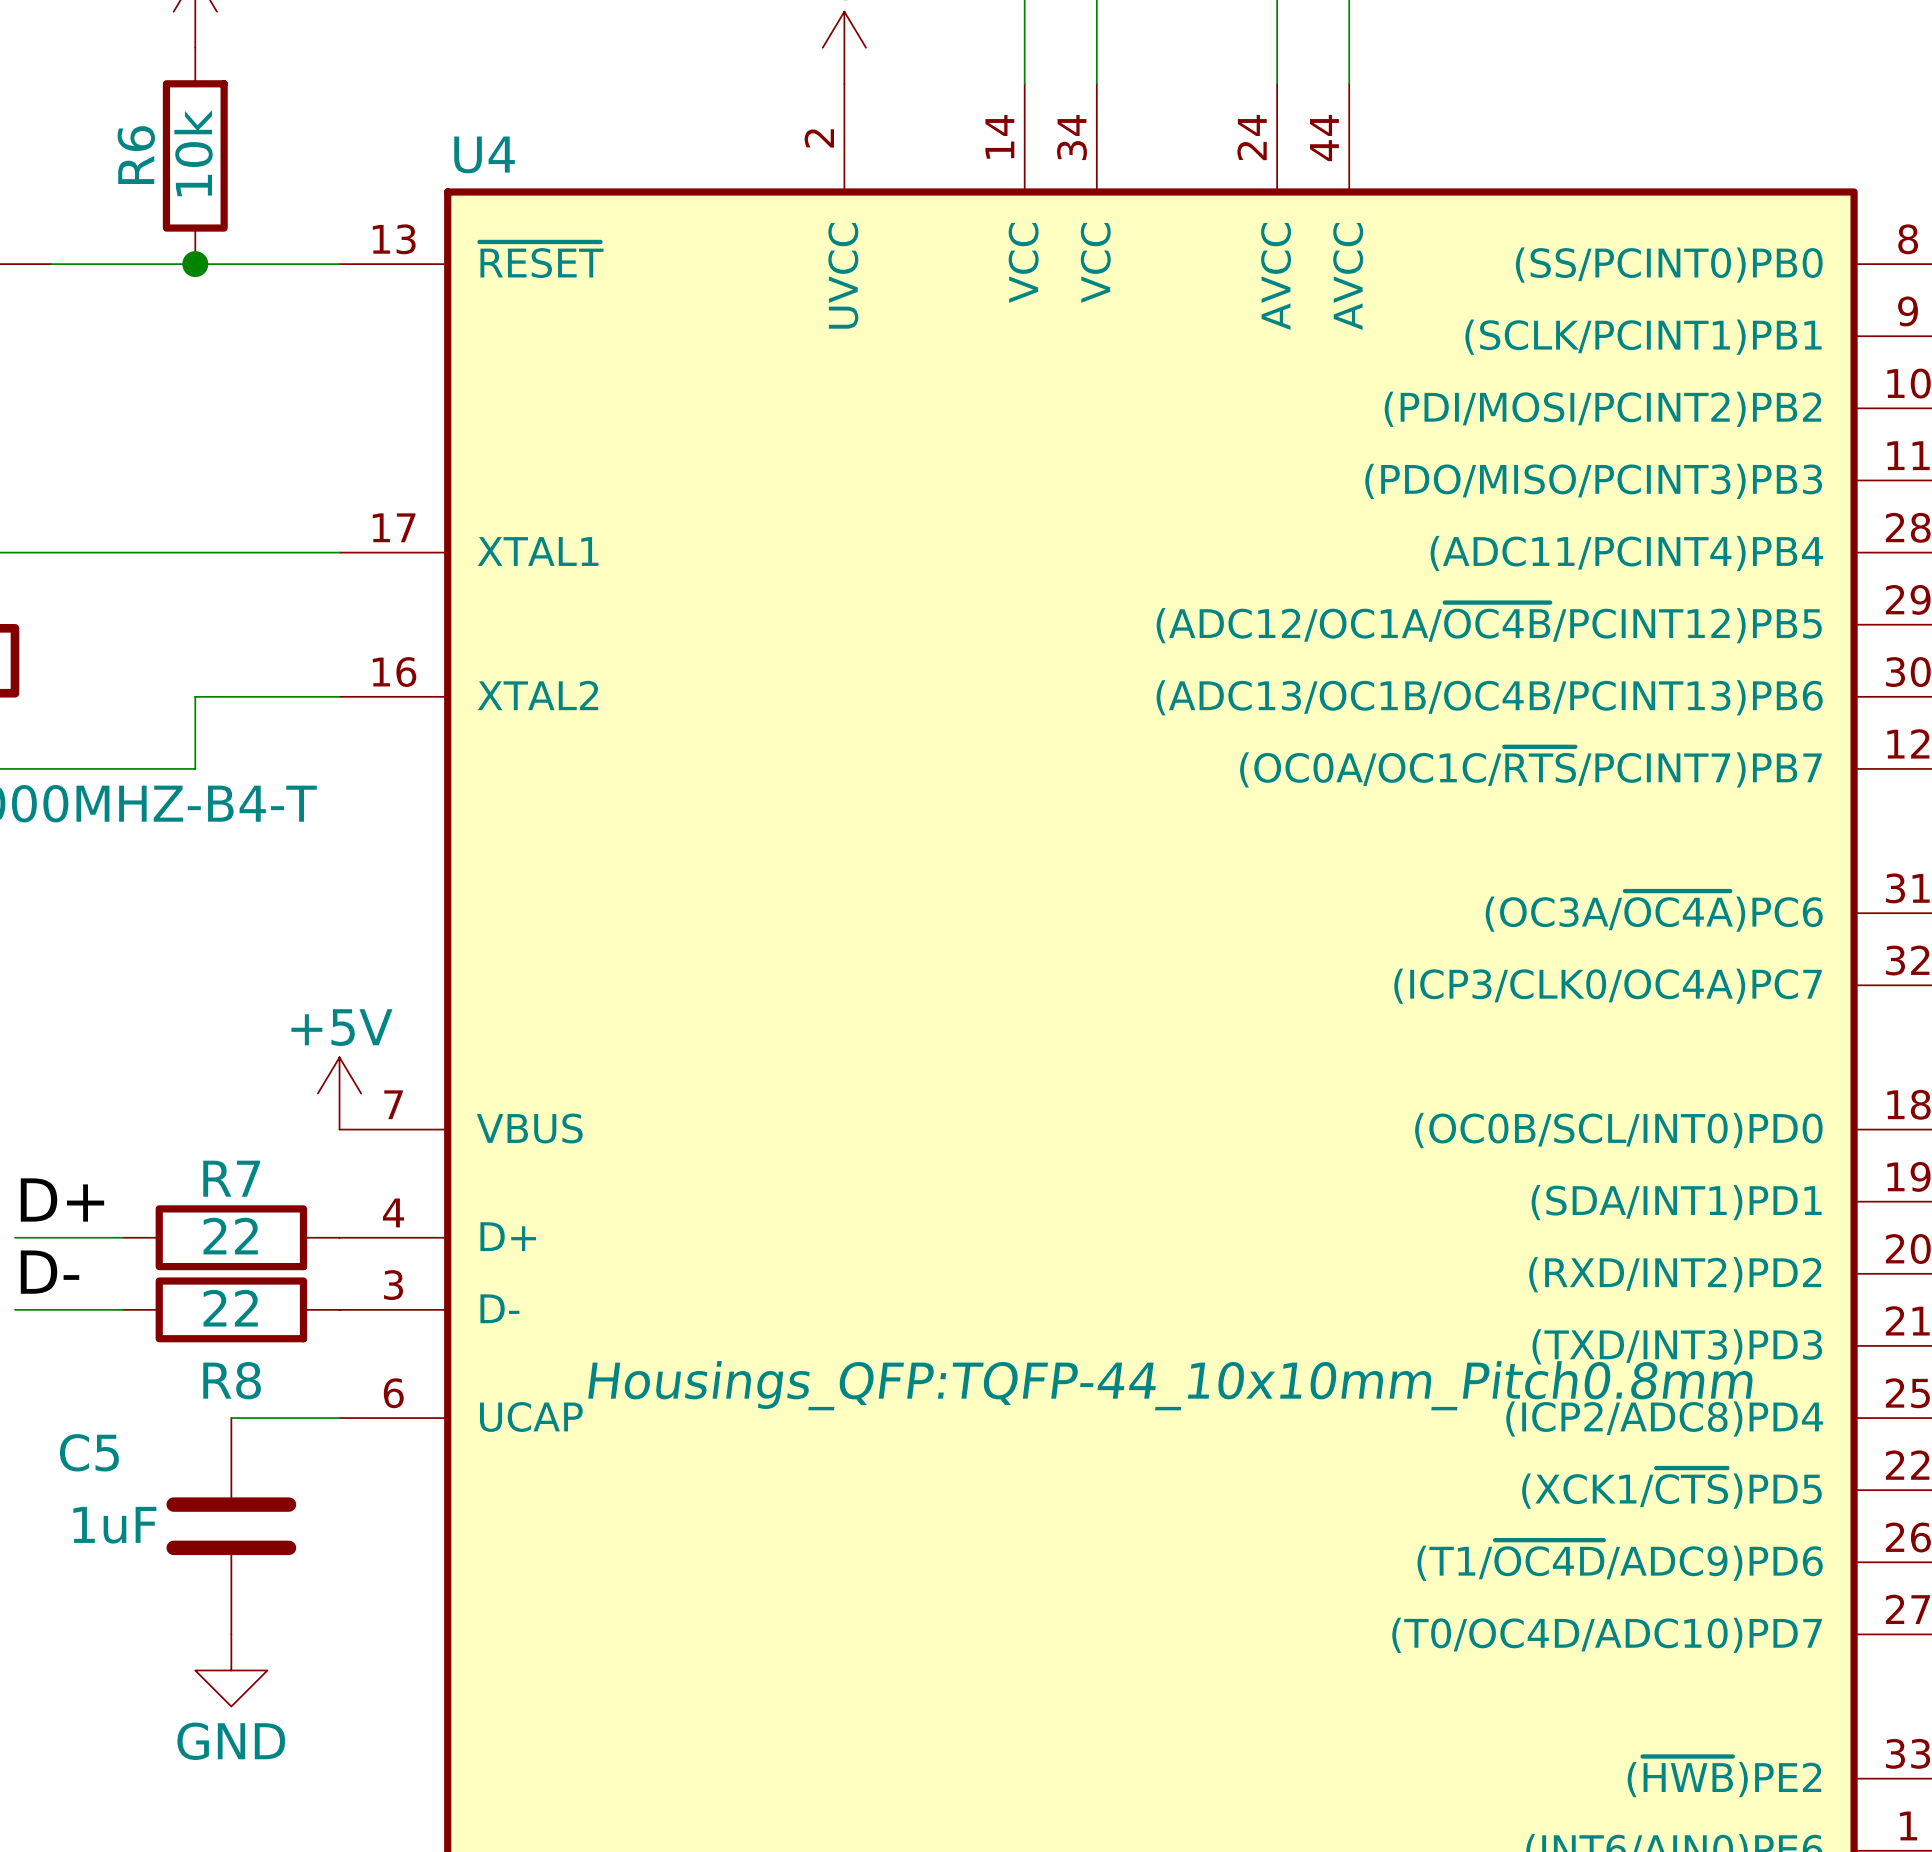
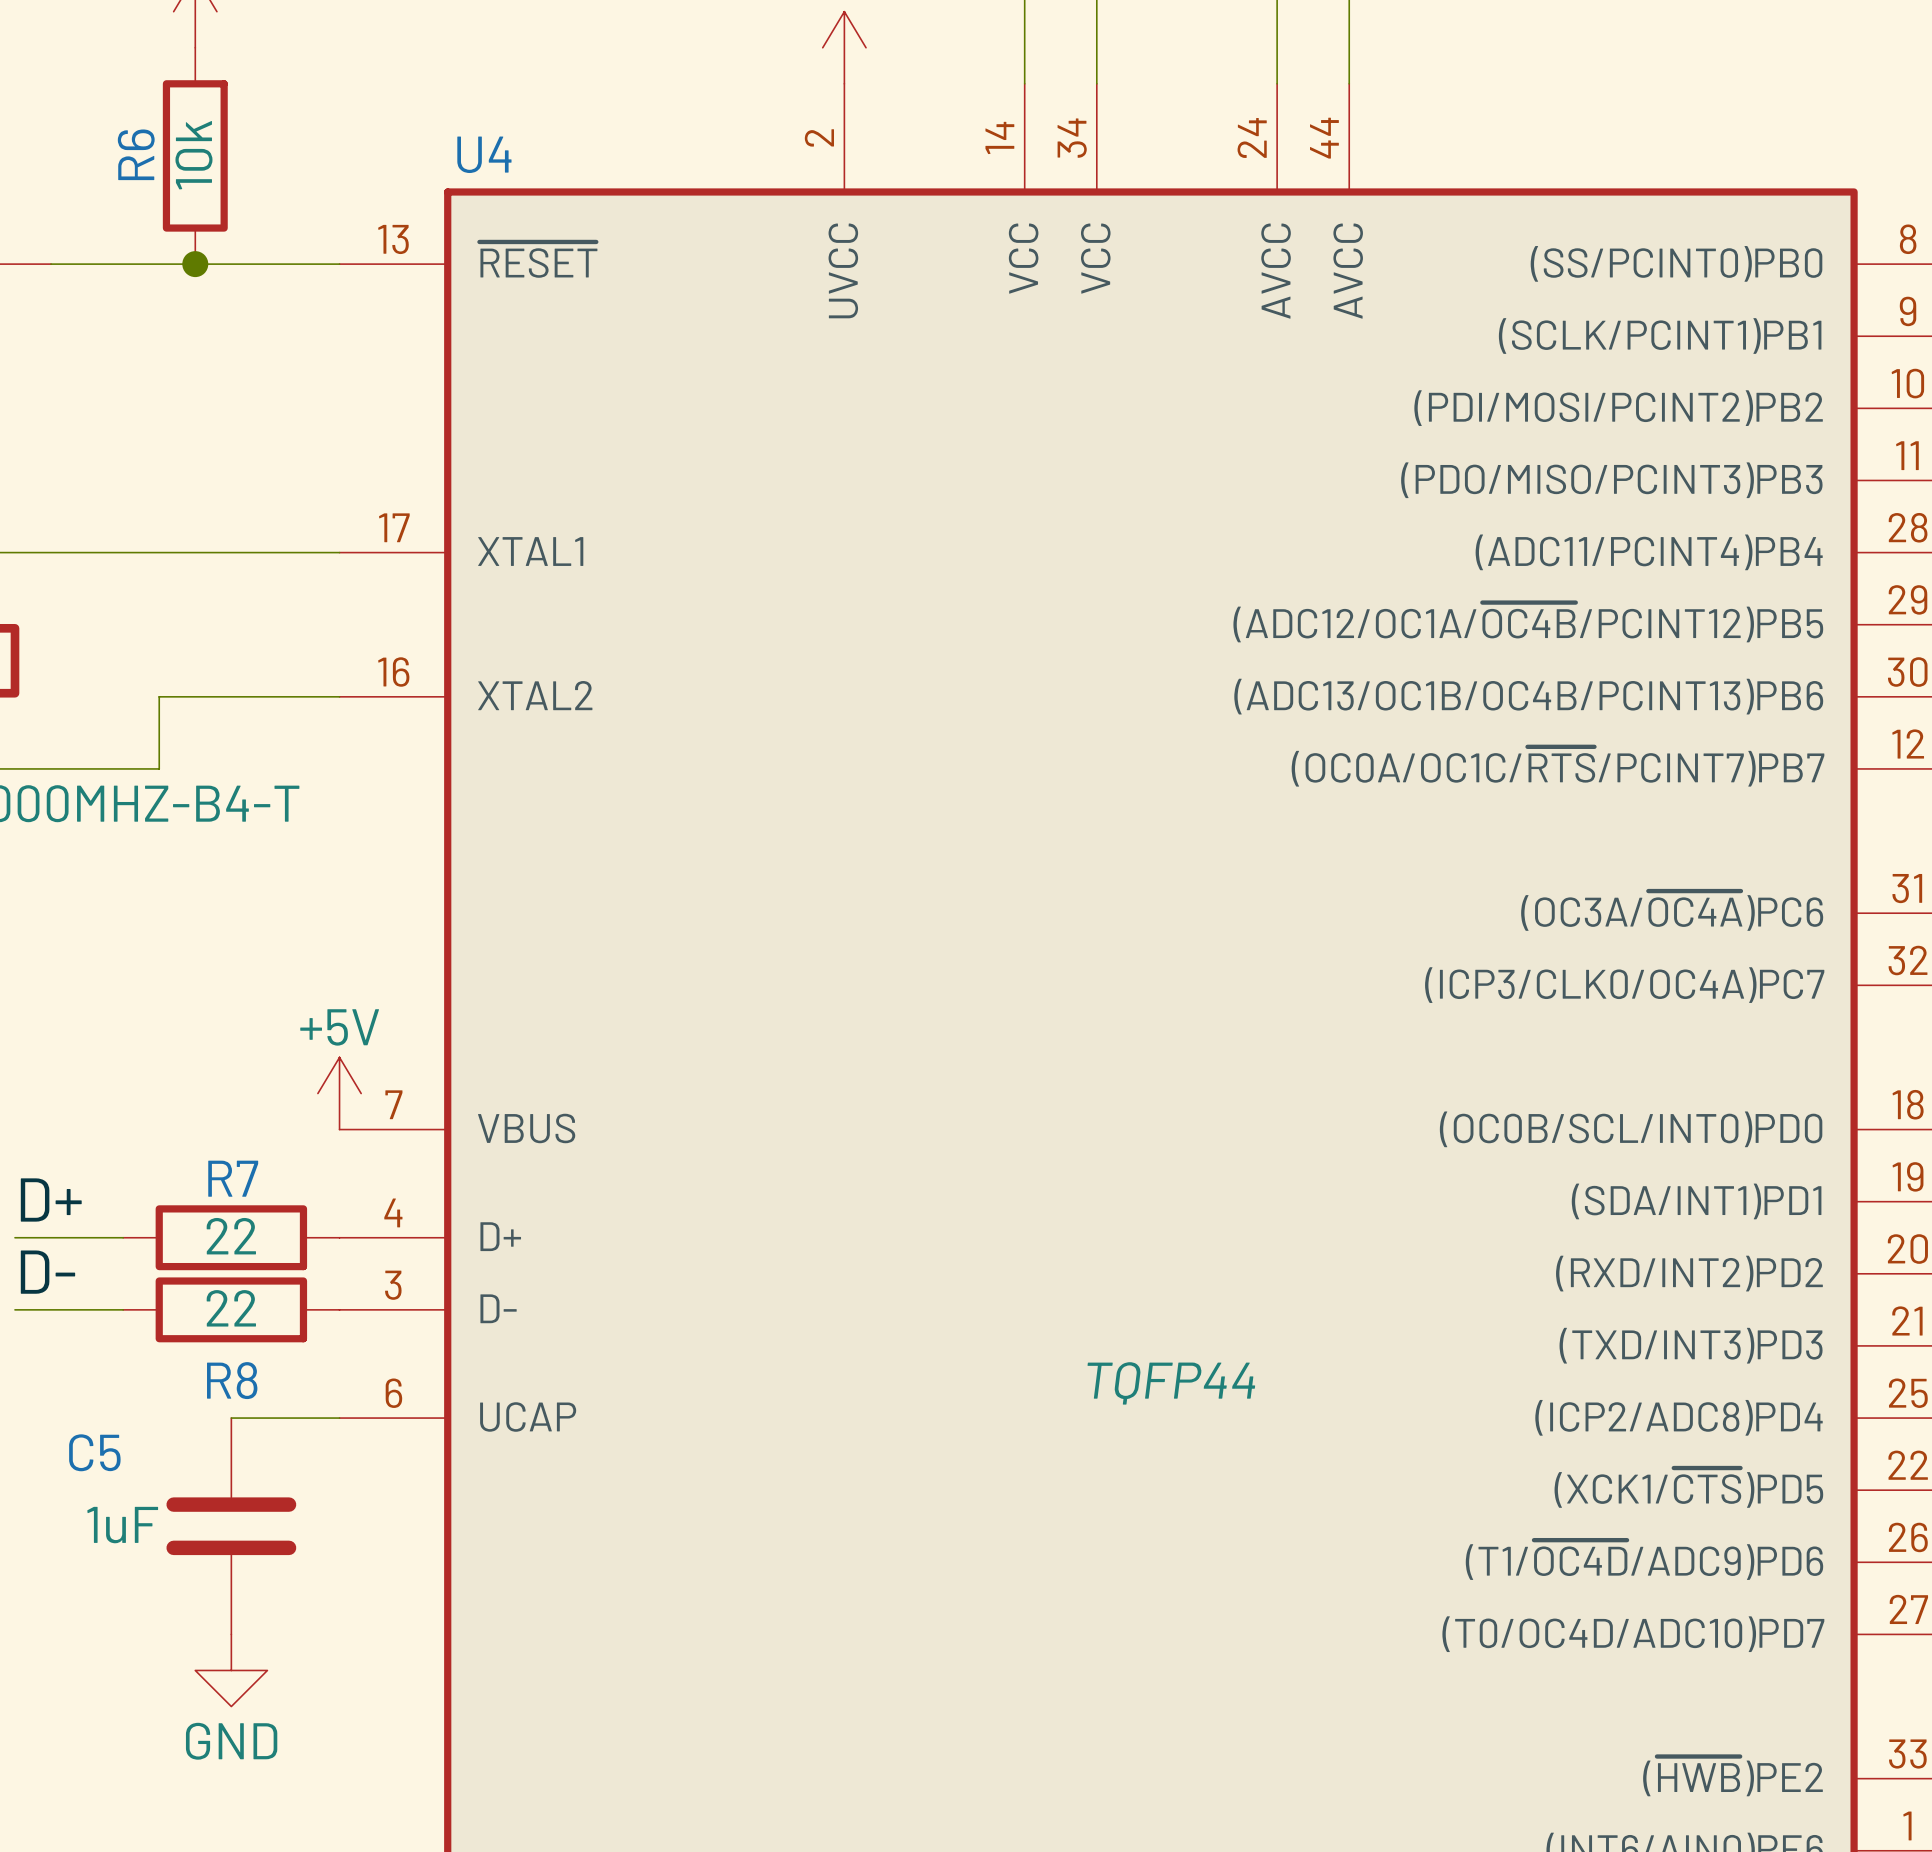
wire: (195, 696) (195, 768) (159, 768) -> (195, 696) (159, 696) (159, 768)
U4 text: Housings_QFP:TQFP-44_10x10mm_Pitch0.8mm (1170, 1385) -> TQFP44 (1171, 1383)

